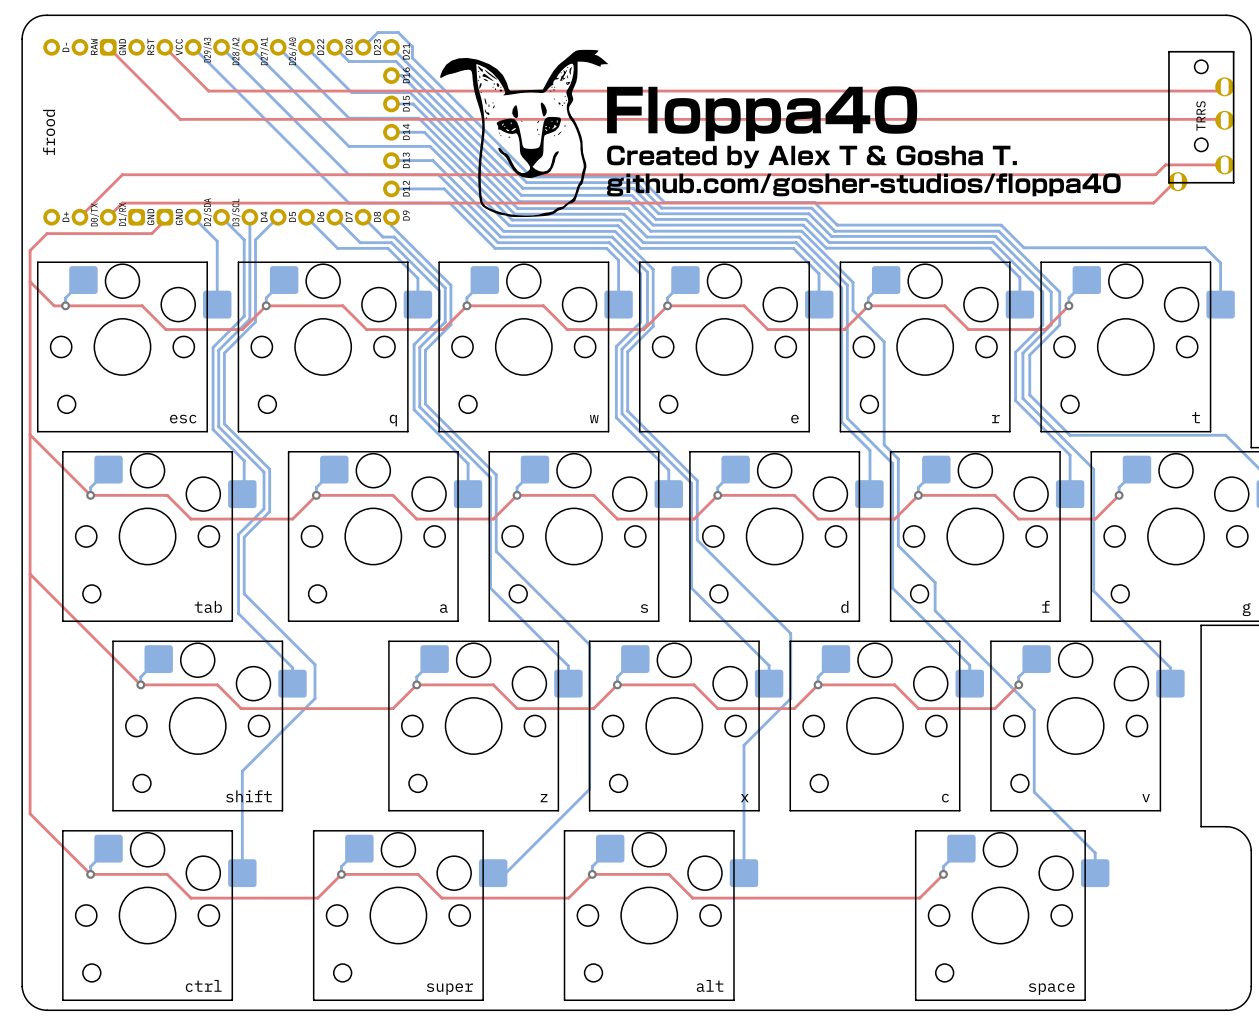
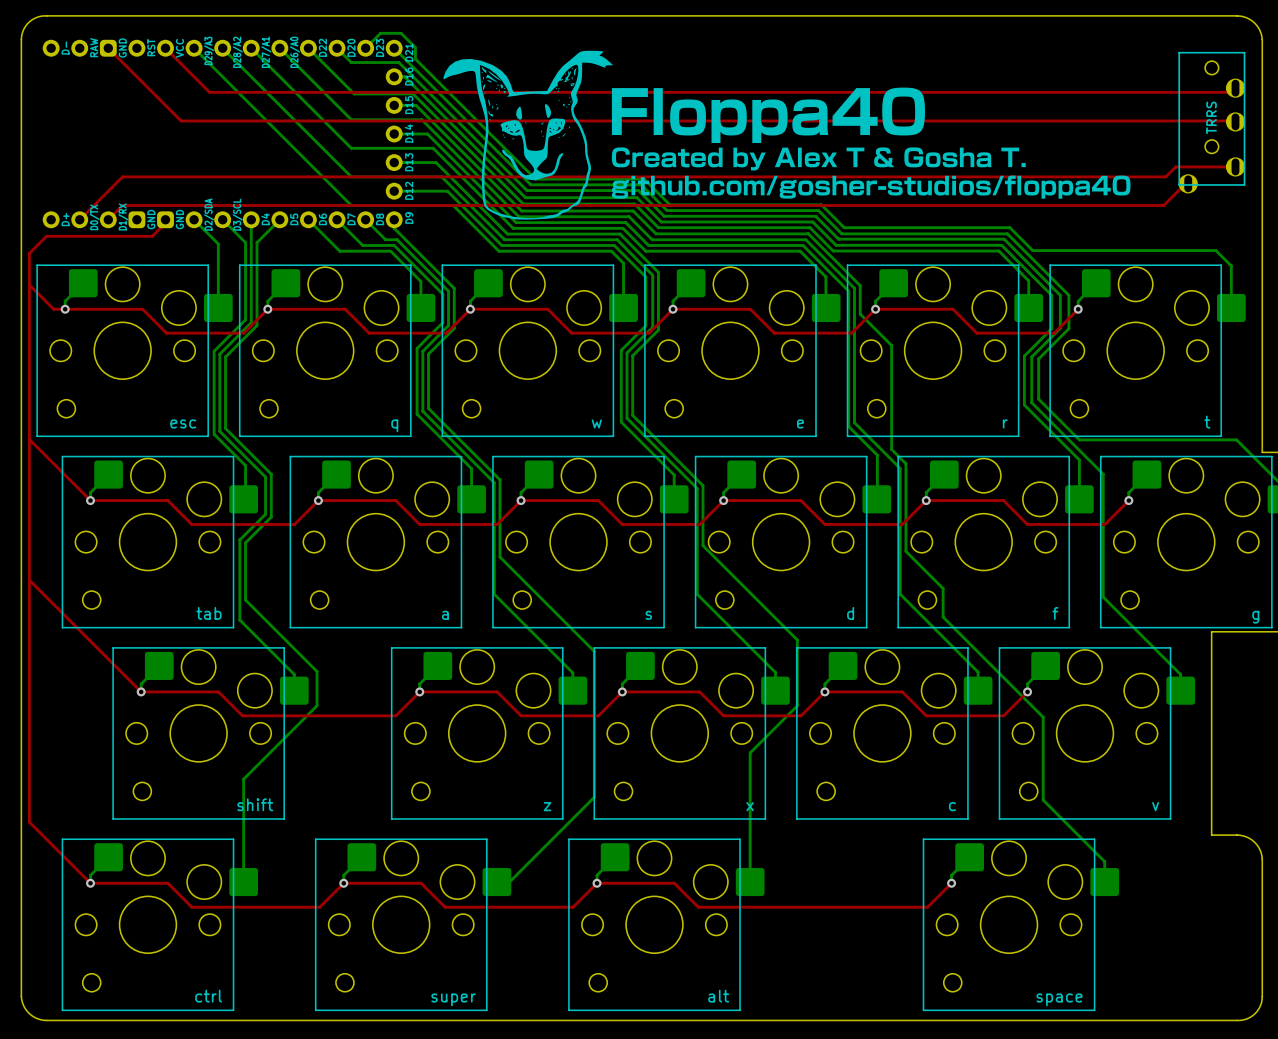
frood name: frood (49, 132) -> none

